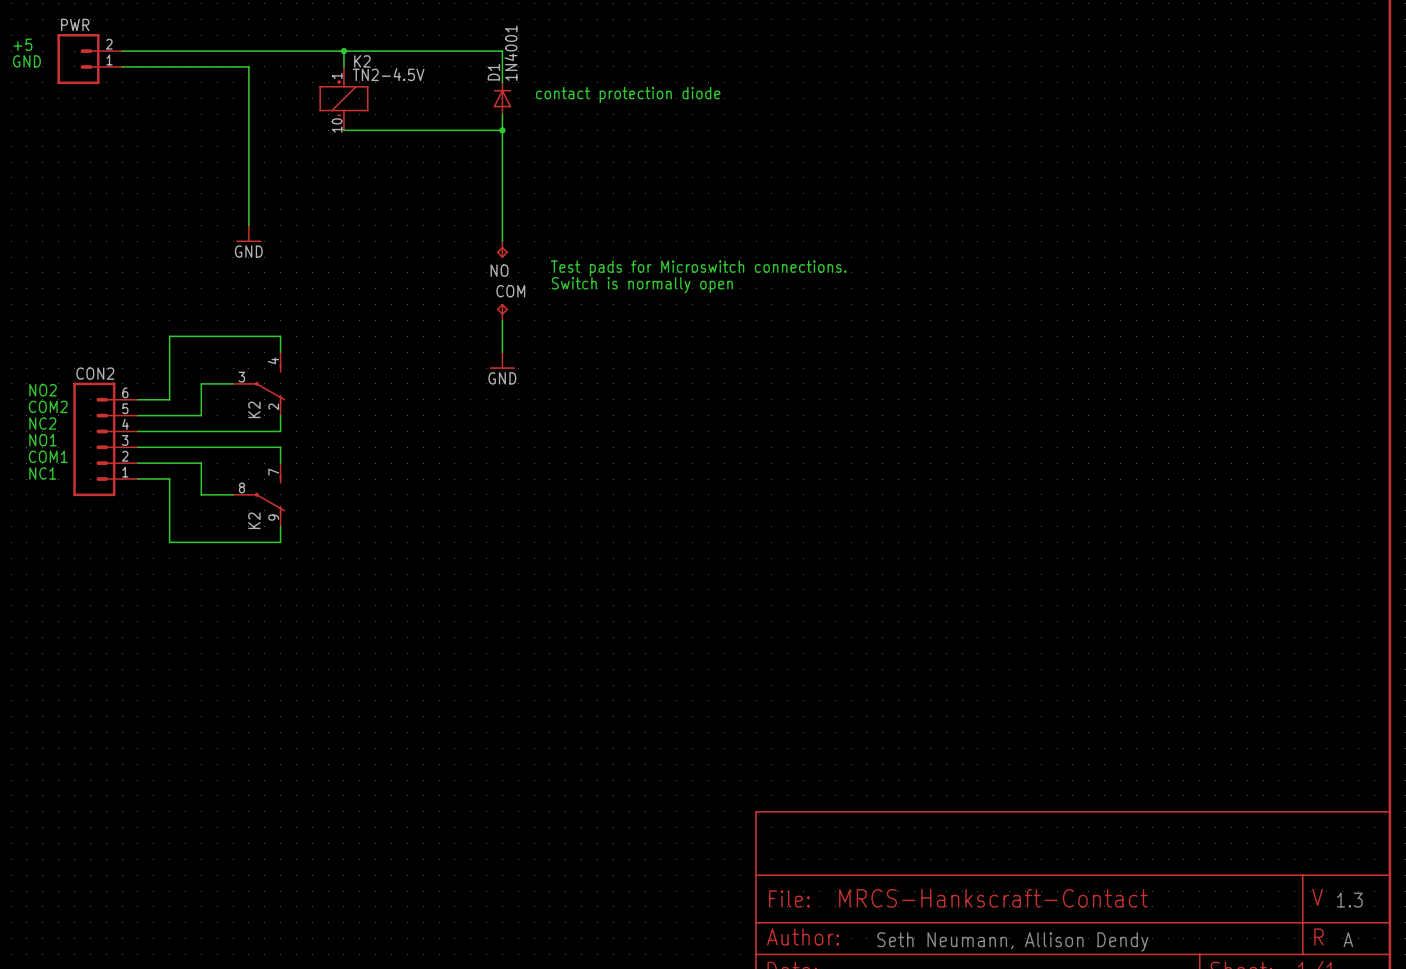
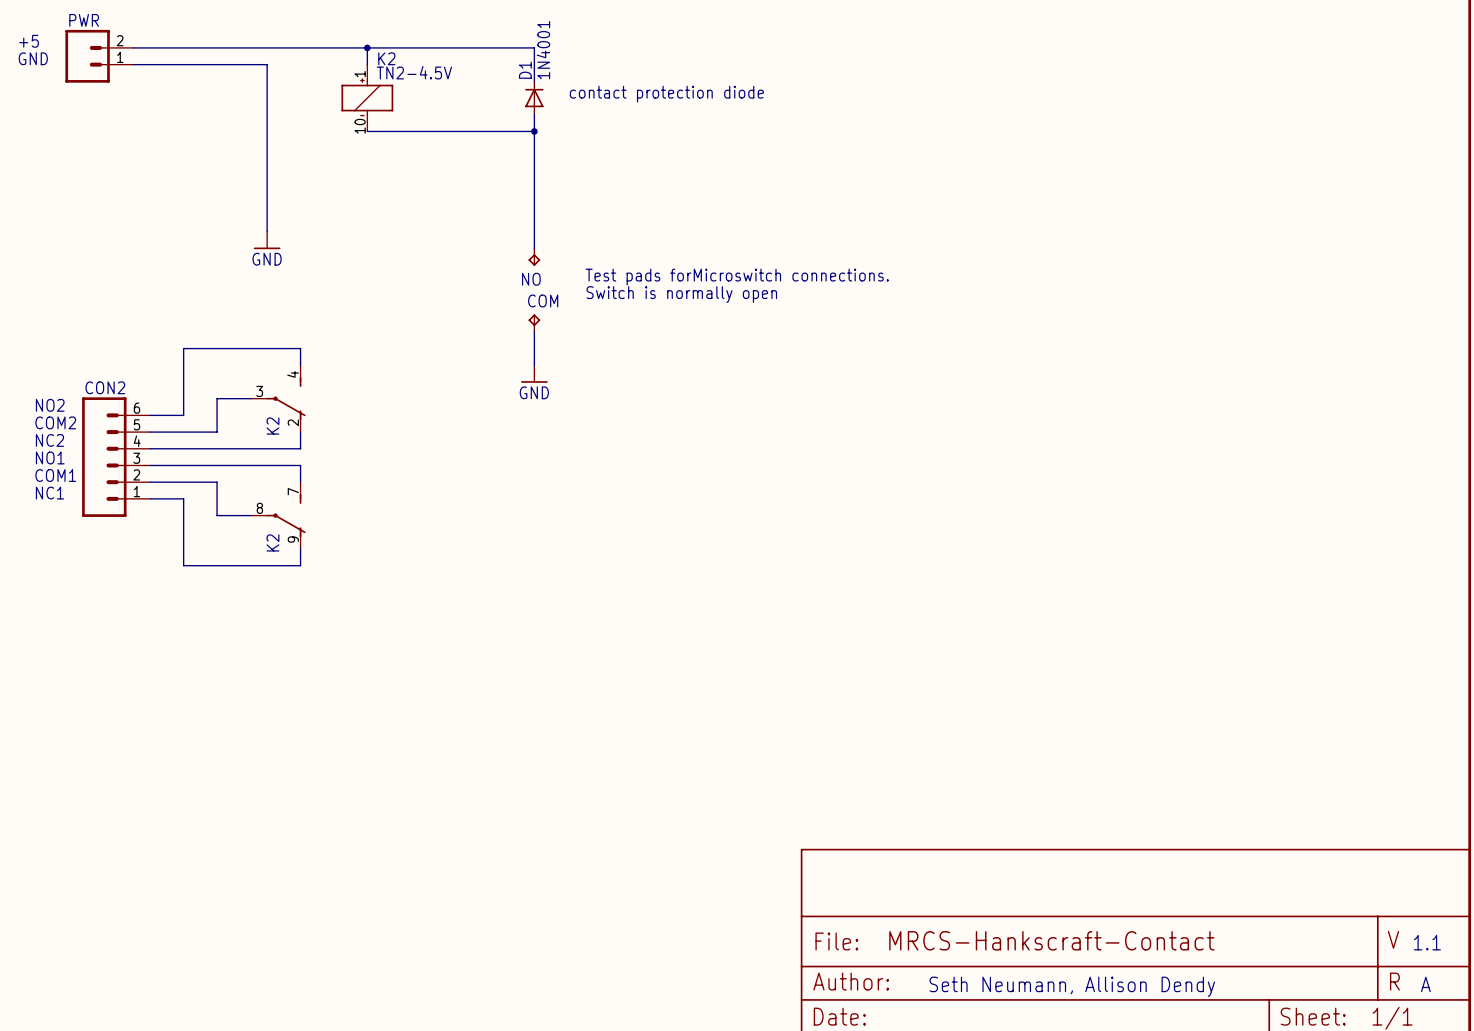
text: Test pads for Microswitch connections. (698, 268) -> Test pads forMicroswitch connections. (737, 277)
text: 1.3 (1349, 900) -> 1.1 (1427, 942)

